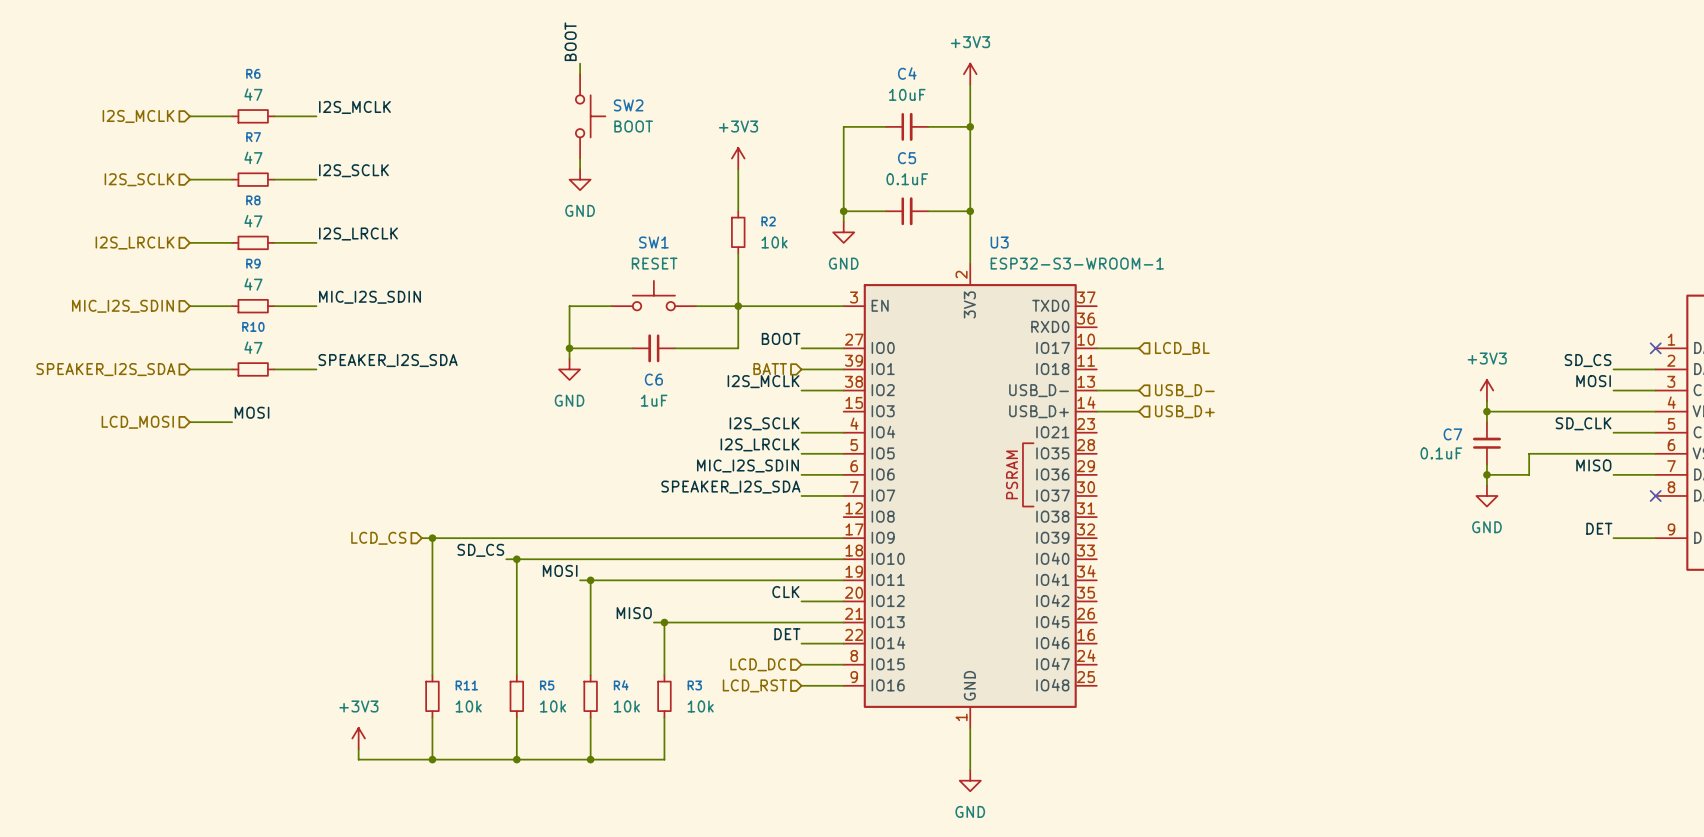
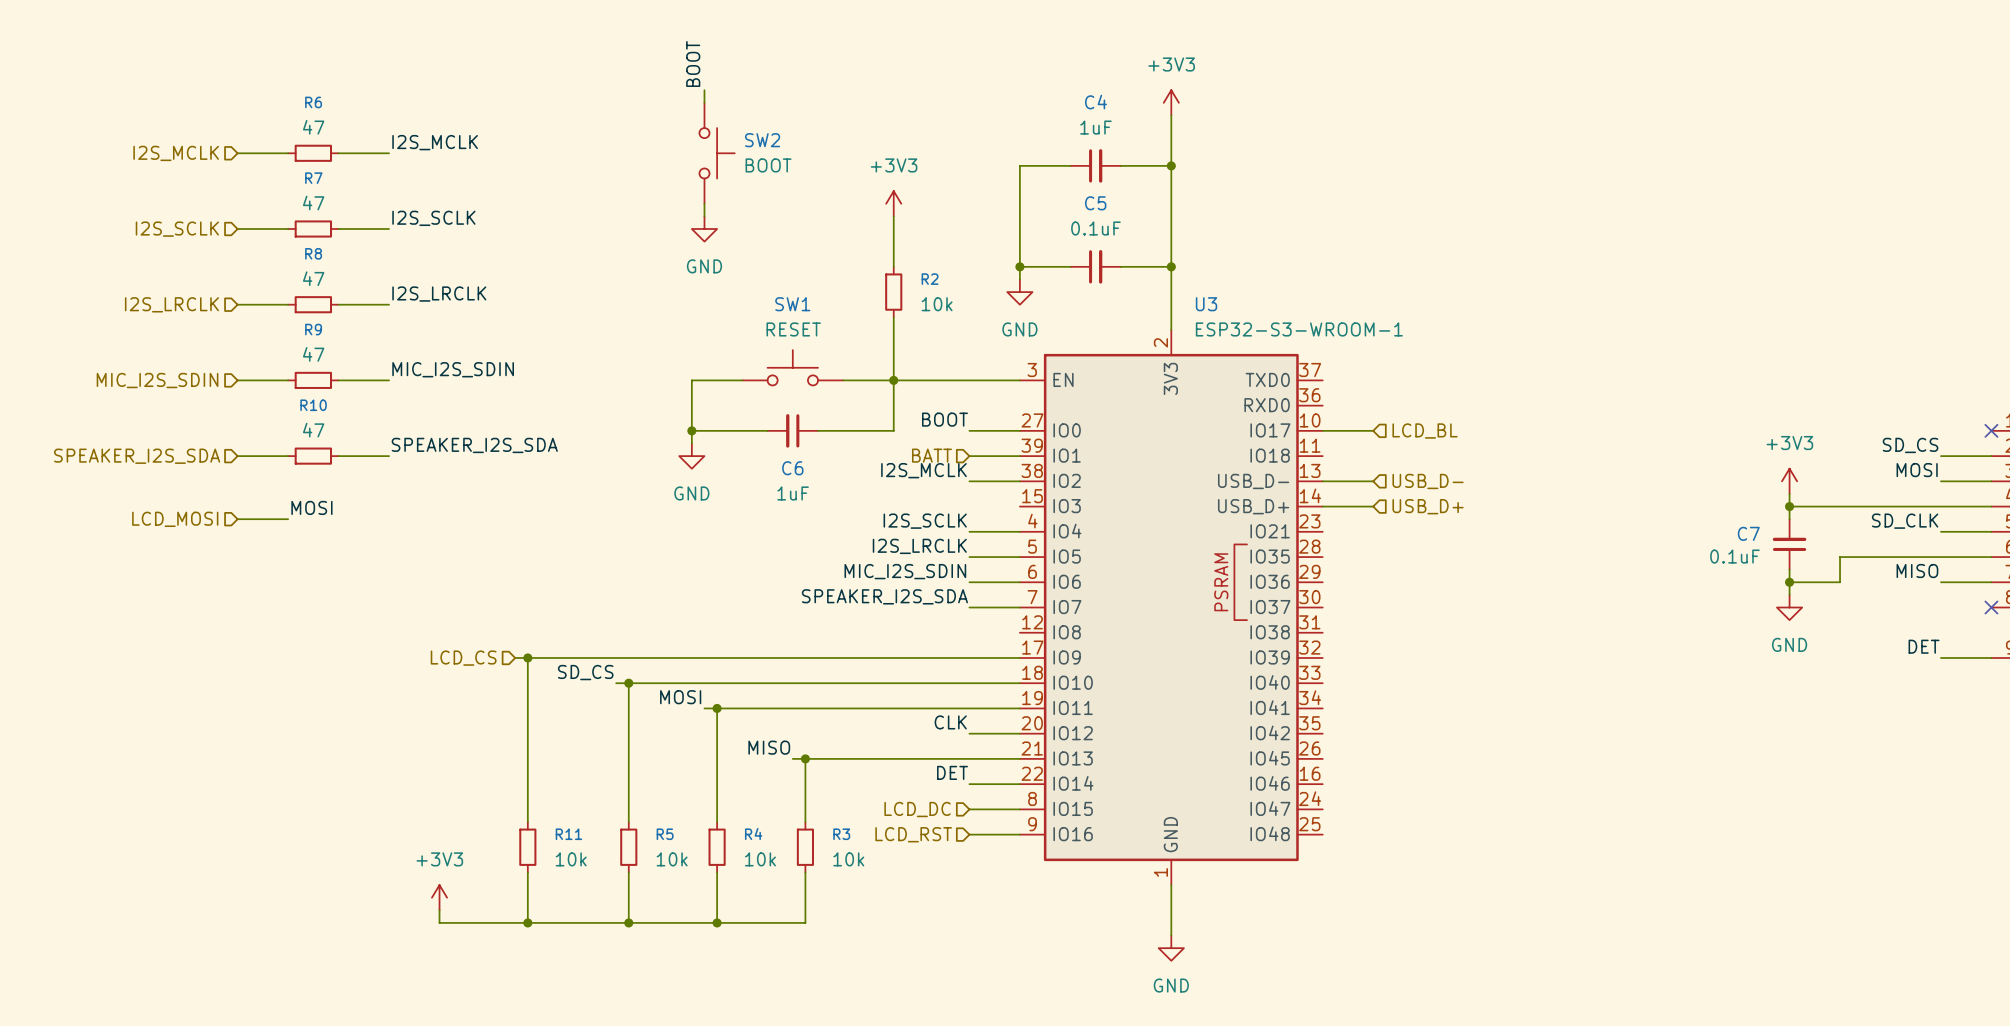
C4 value: 10uF (907, 94) -> 1uF (1095, 127)

